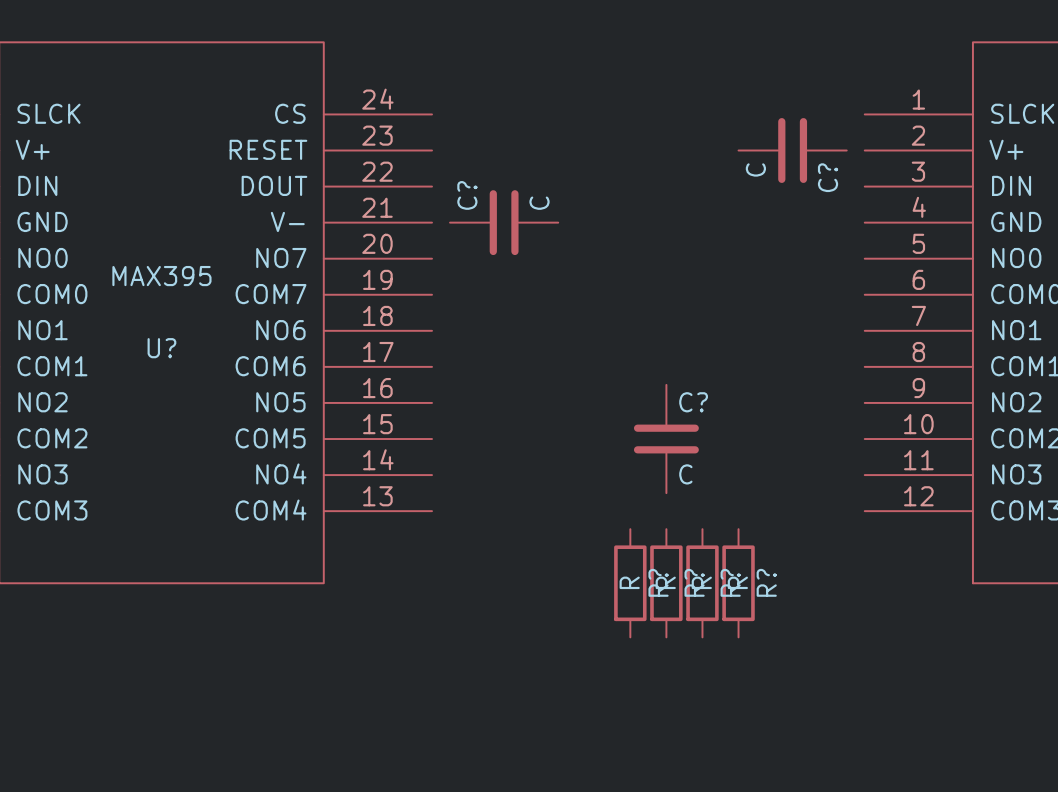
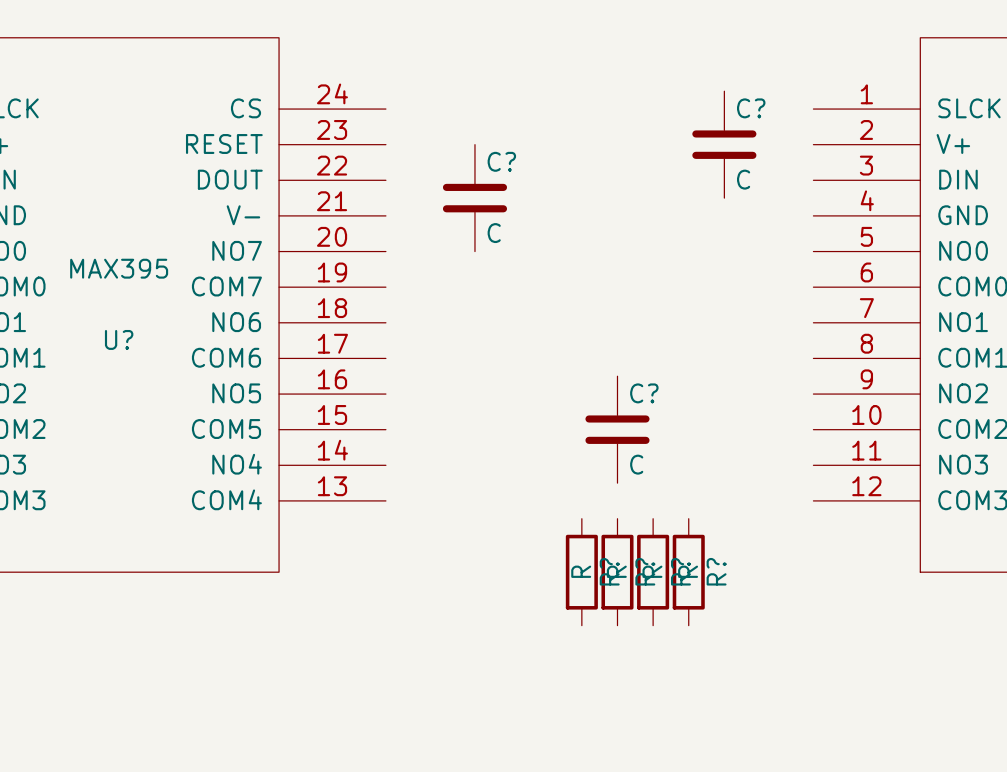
C? rotation: 0° (792, 150) -> 90° clockwise (724, 144)
C? value position: C (755, 169) -> C (743, 179)
C? name position: C? (828, 177) -> C? (751, 108)
C? rotation: 0° (504, 222) -> 90° clockwise (474, 198)

